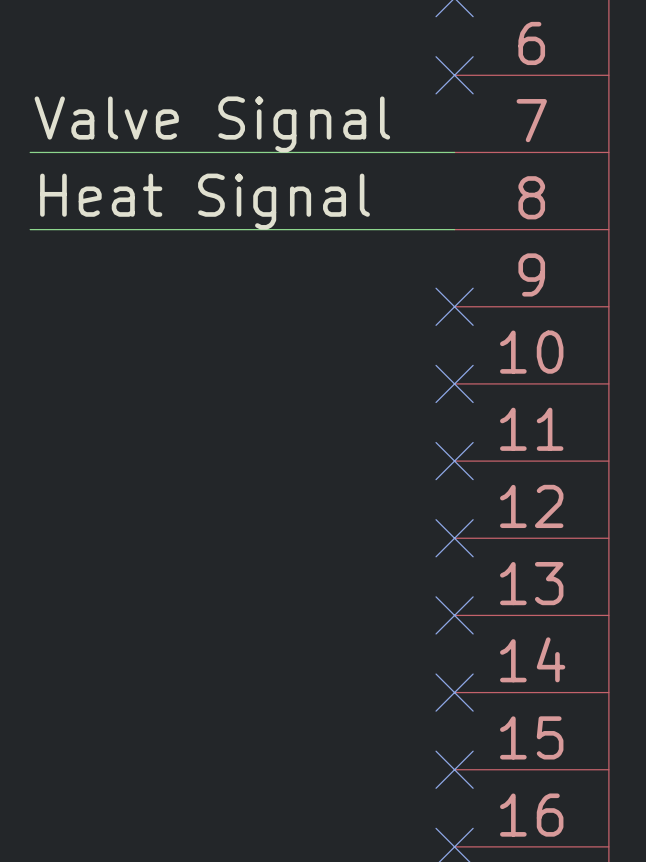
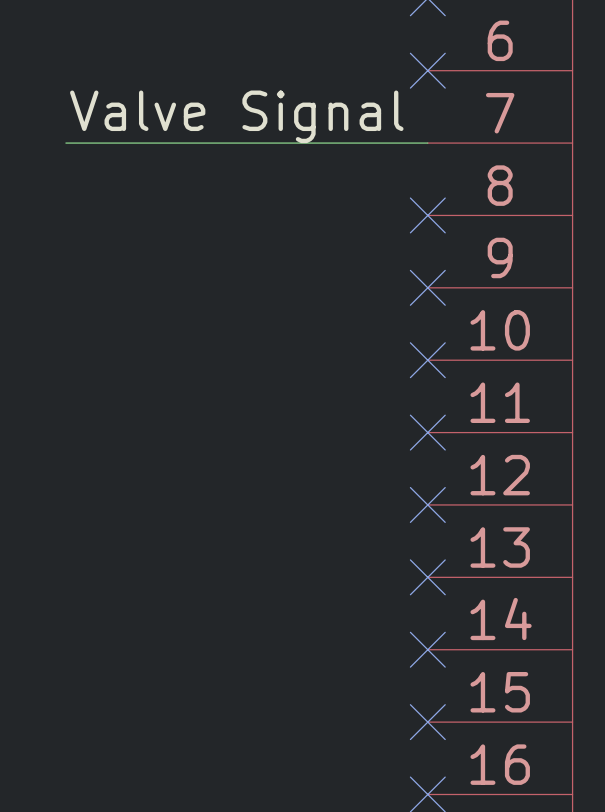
label position: Valve Signal (212, 124) -> Valve Signal (236, 116)
wire: (30, 152) (68, 152) -> none
label: Heat Signal (205, 201) -> none
wire: (30, 229) (454, 229) -> none
no-connect mark: none -> (427, 215)

